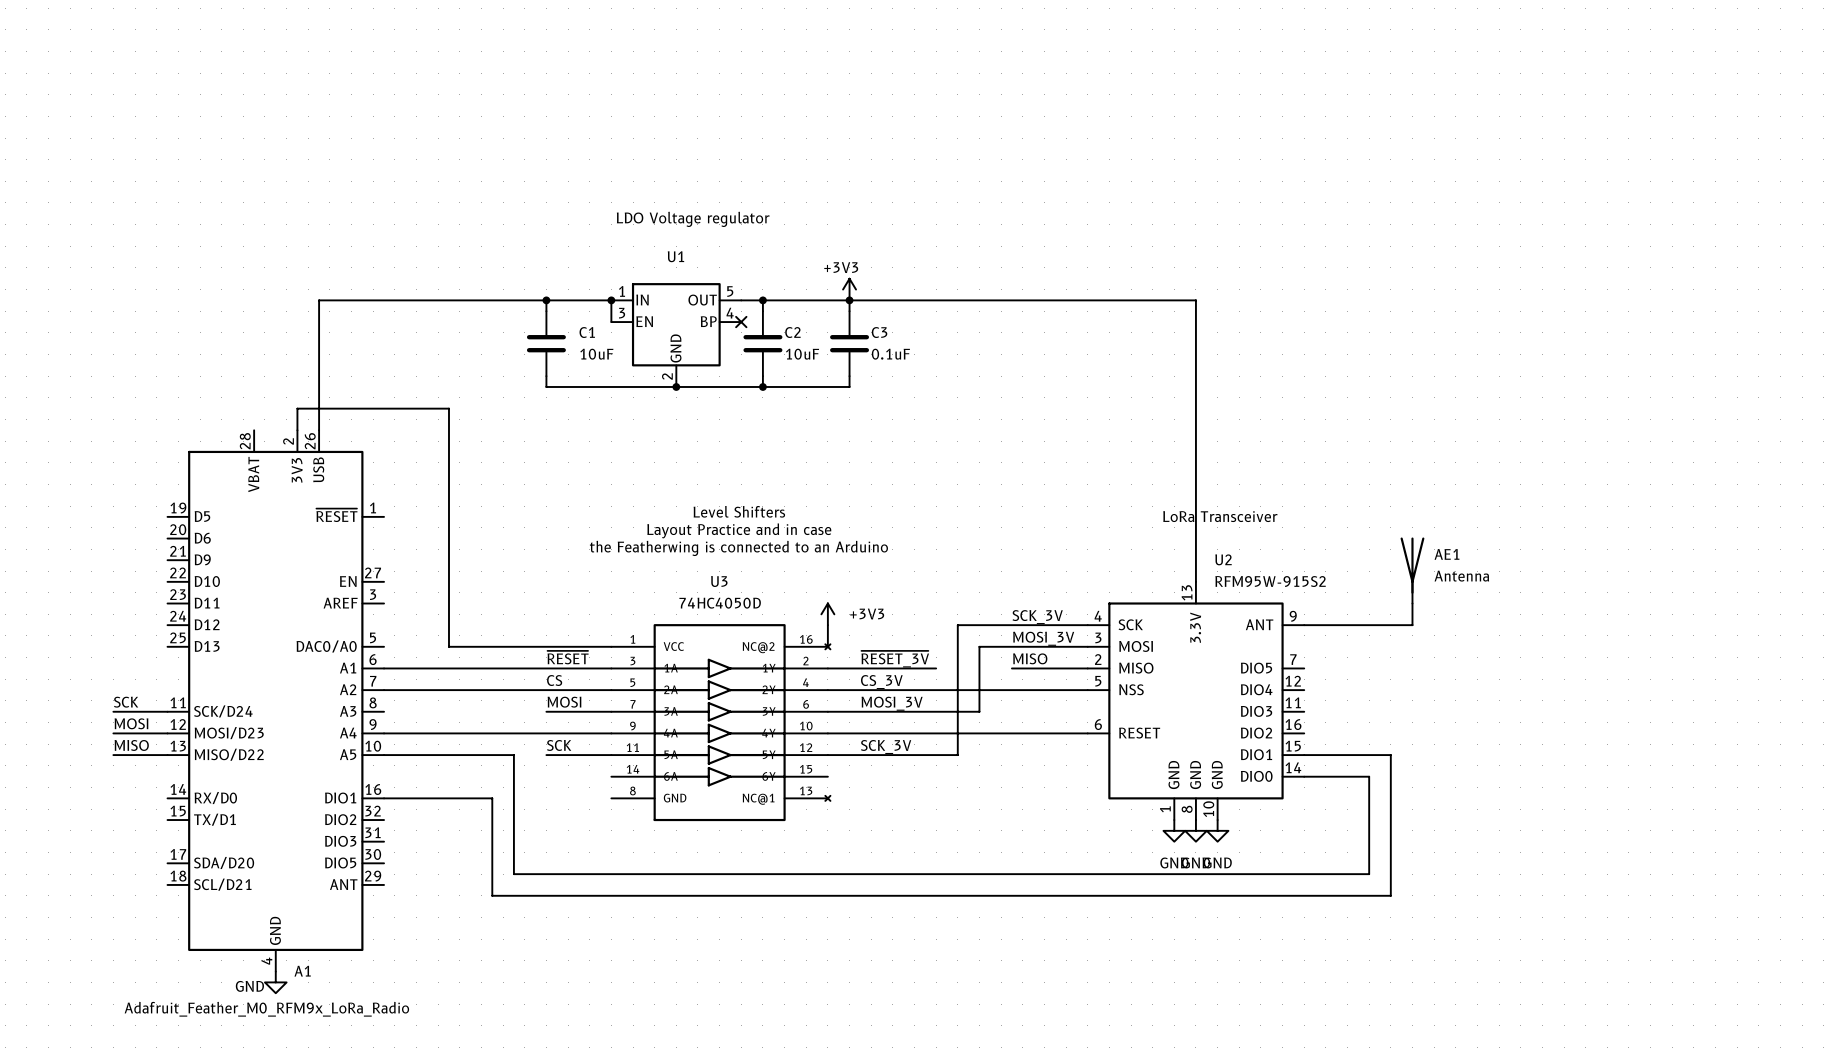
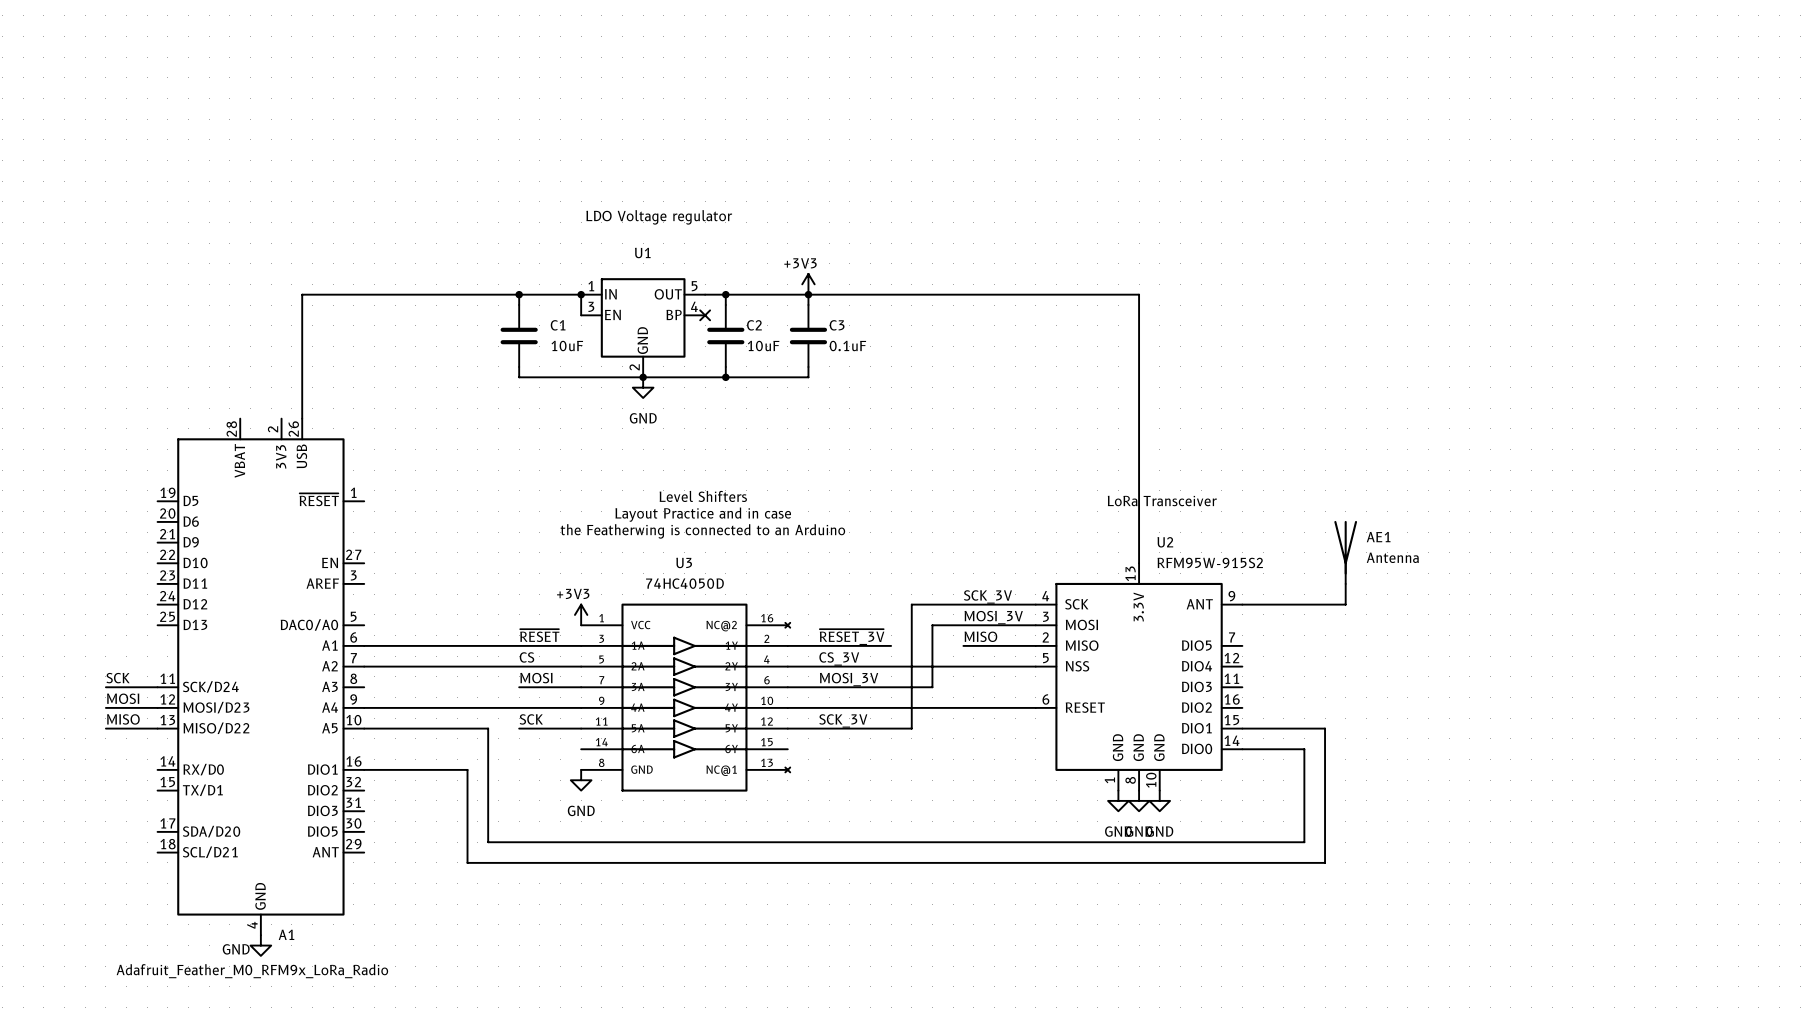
power symbol: none -> GND (643, 387)
wire: (297, 430) (297, 408) (448, 408) (448, 646) (611, 646) -> none
power symbol: +3V3 (827, 614) -> none
wire: (827, 625) (827, 646) -> none
power symbol: none -> +3V3 (581, 614)
power symbol: none -> GND (581, 780)

